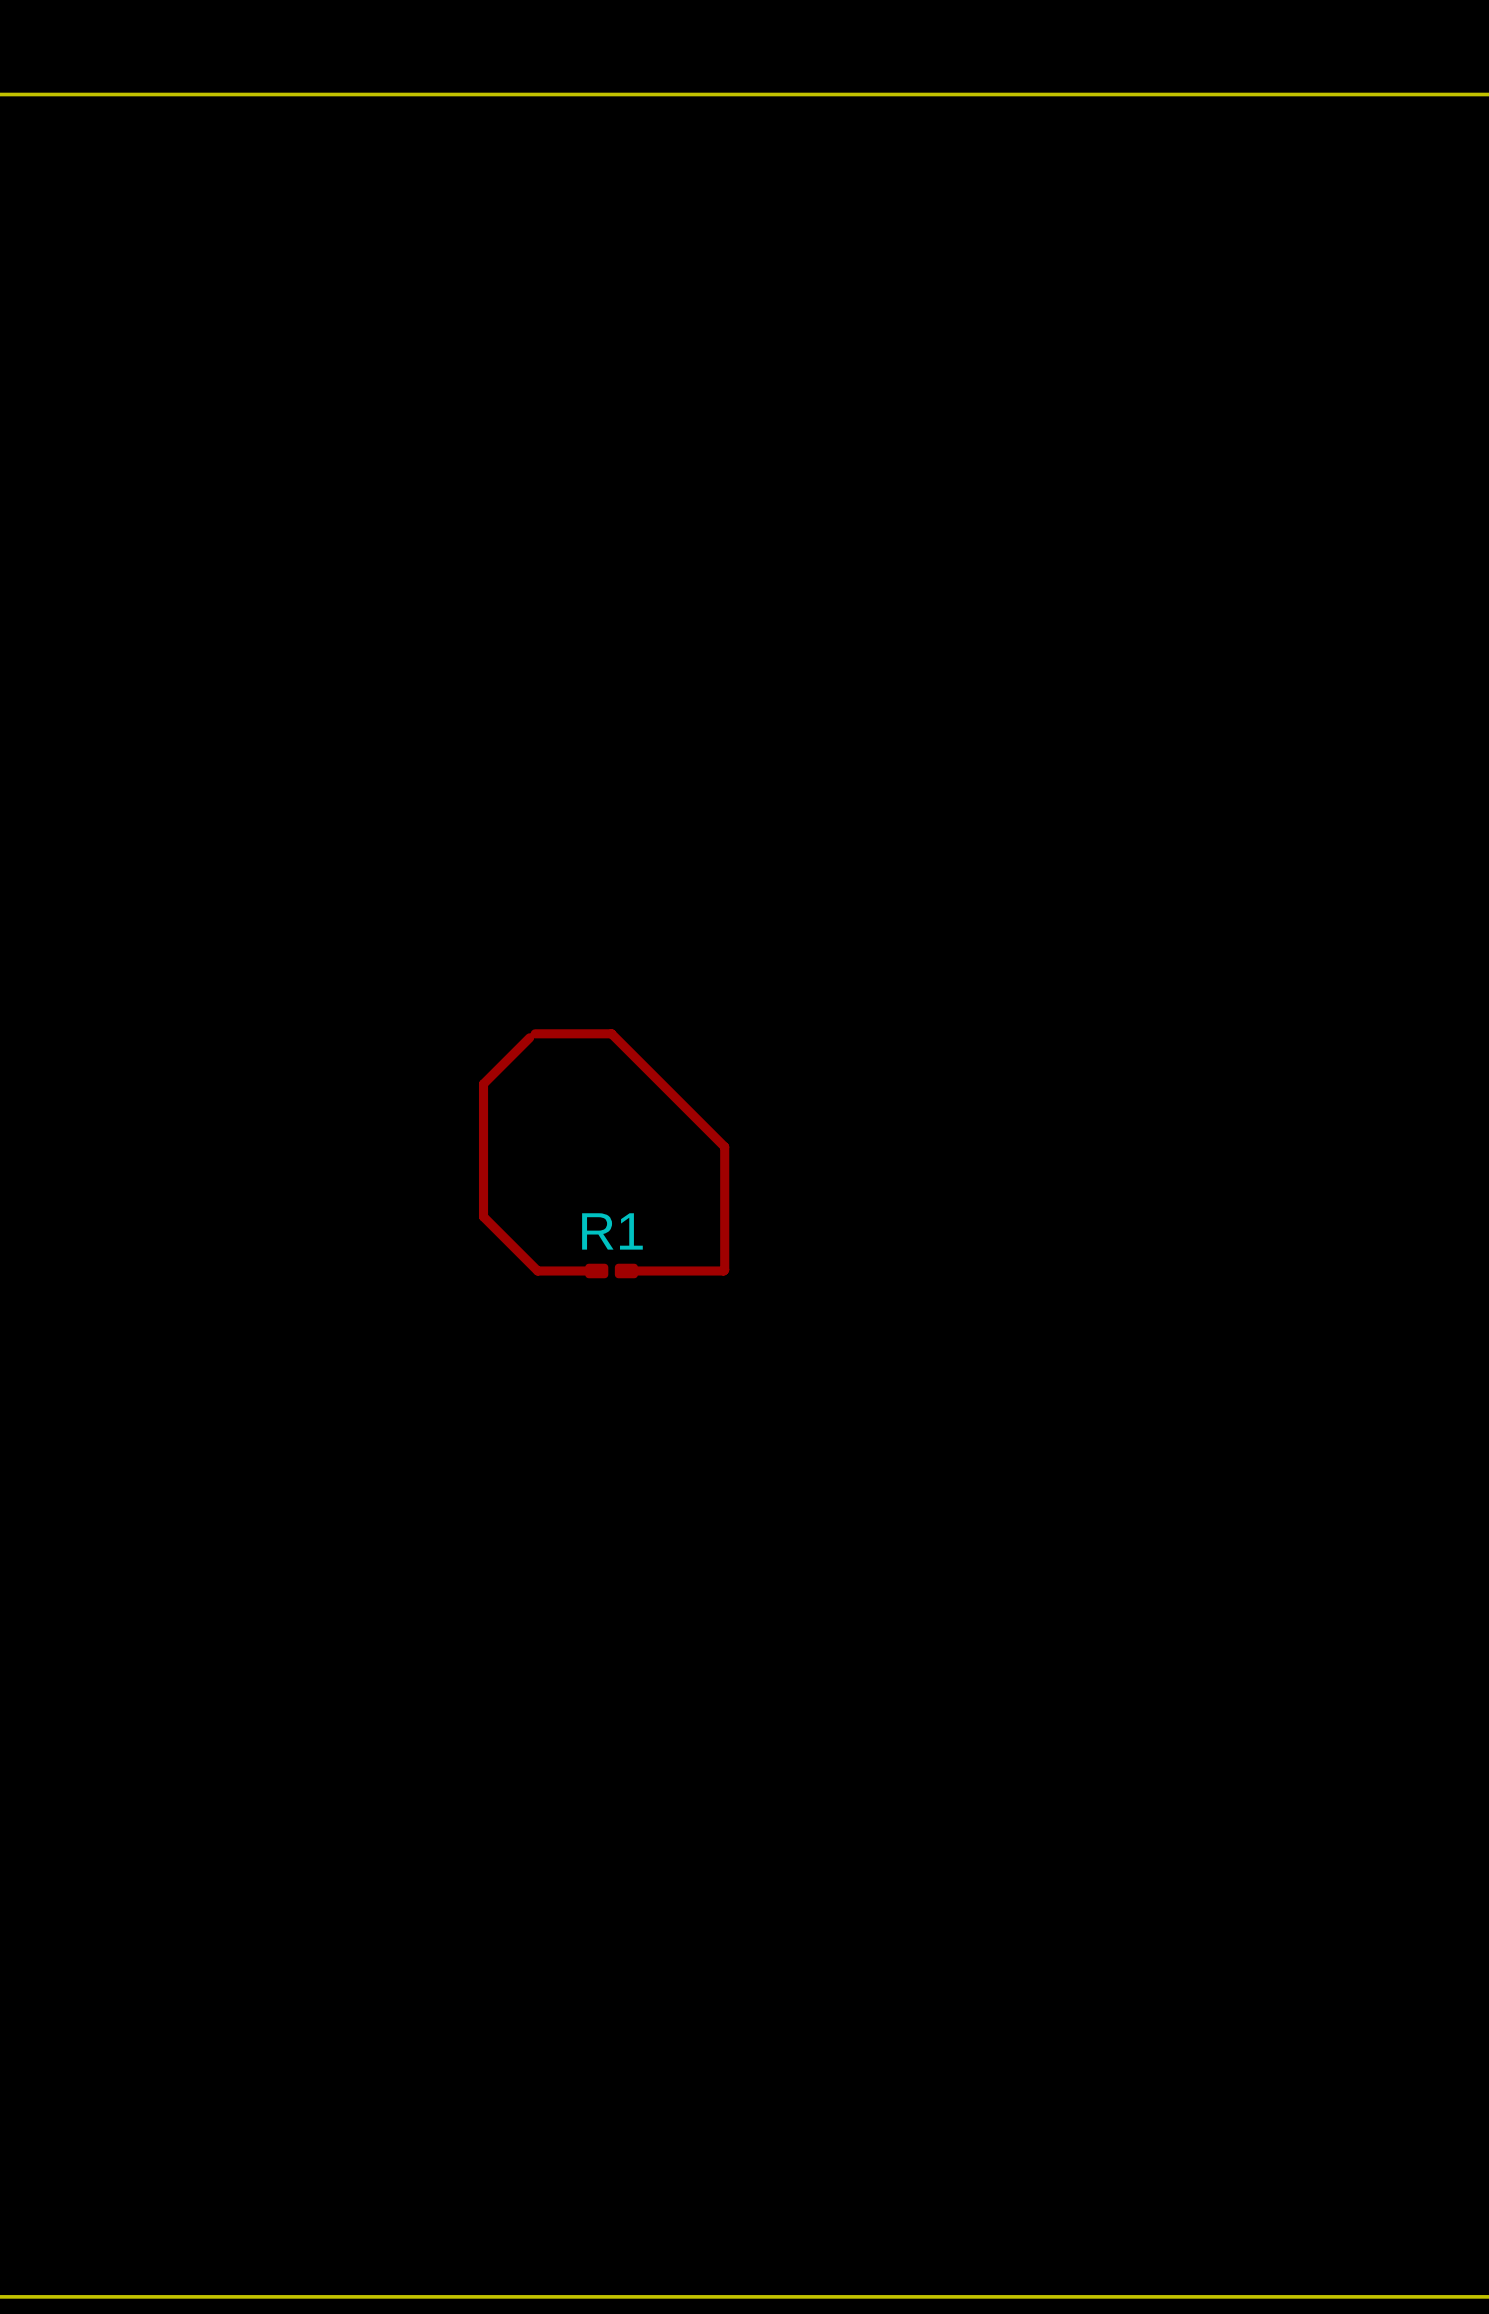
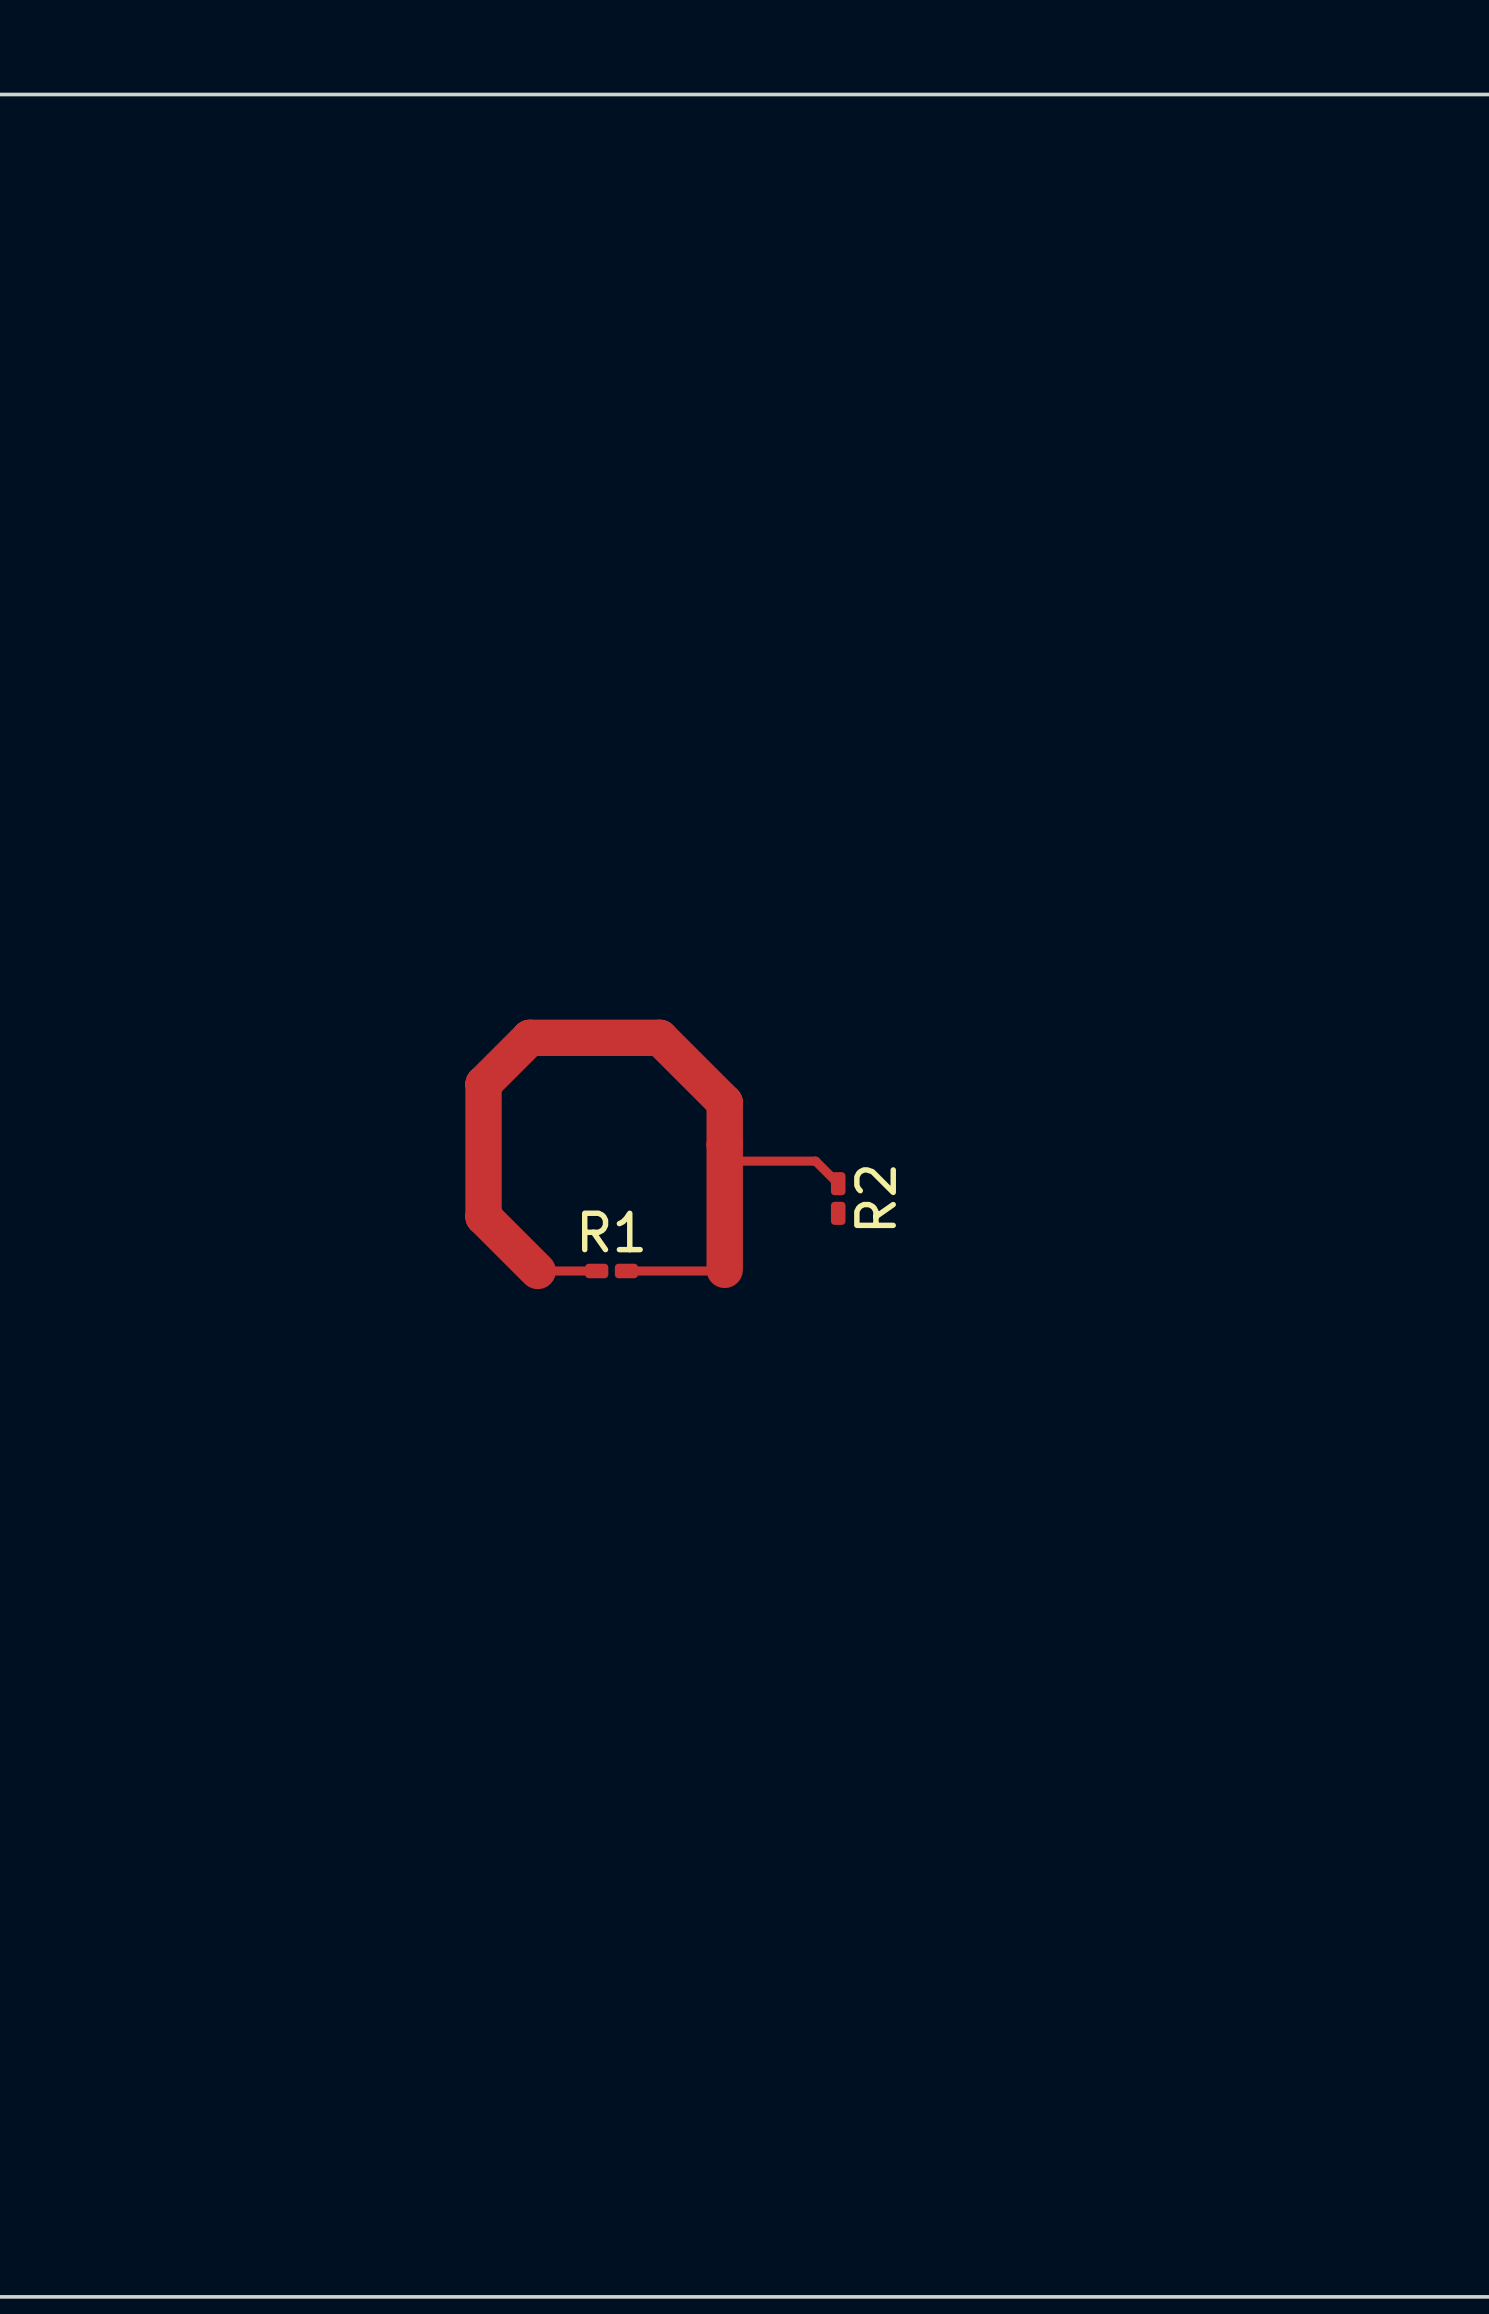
top track: (535, 1033) (611, 1033) (724, 1146) -> (529, 1037) (659, 1037) (724, 1102) (724, 1146)
top track width: thin (529, 1037) (483, 1084) (483, 1216) (537, 1270) -> thick (529, 1037) (483, 1084) (483, 1216) (537, 1270)
top track: none -> (724, 1144) (741, 1161) (815, 1161) (838, 1183)
top track width: thin (724, 1146) (724, 1269) -> thick (724, 1146) (724, 1269)
R2: none -> (838, 1198)

